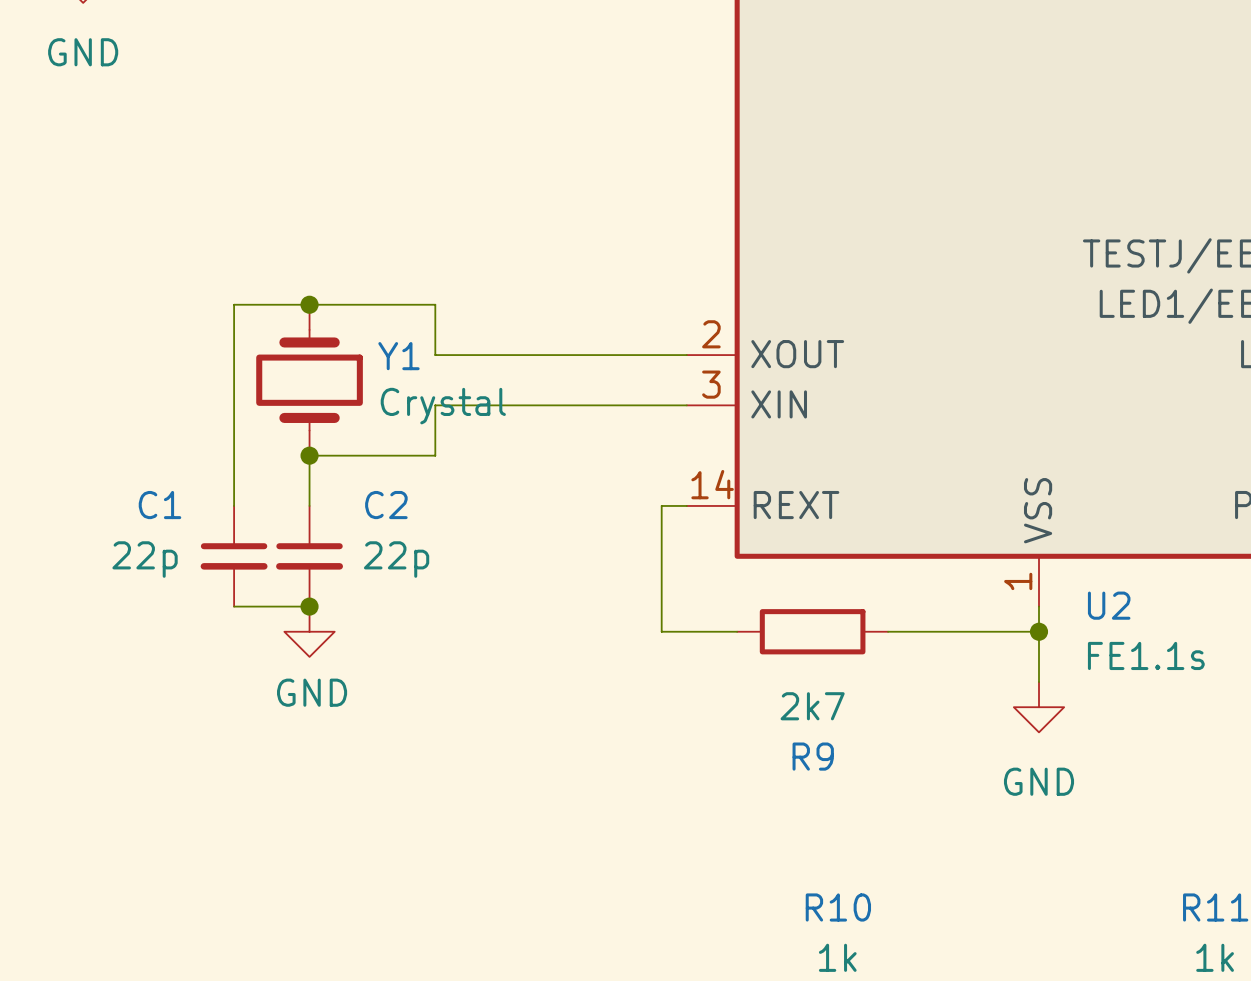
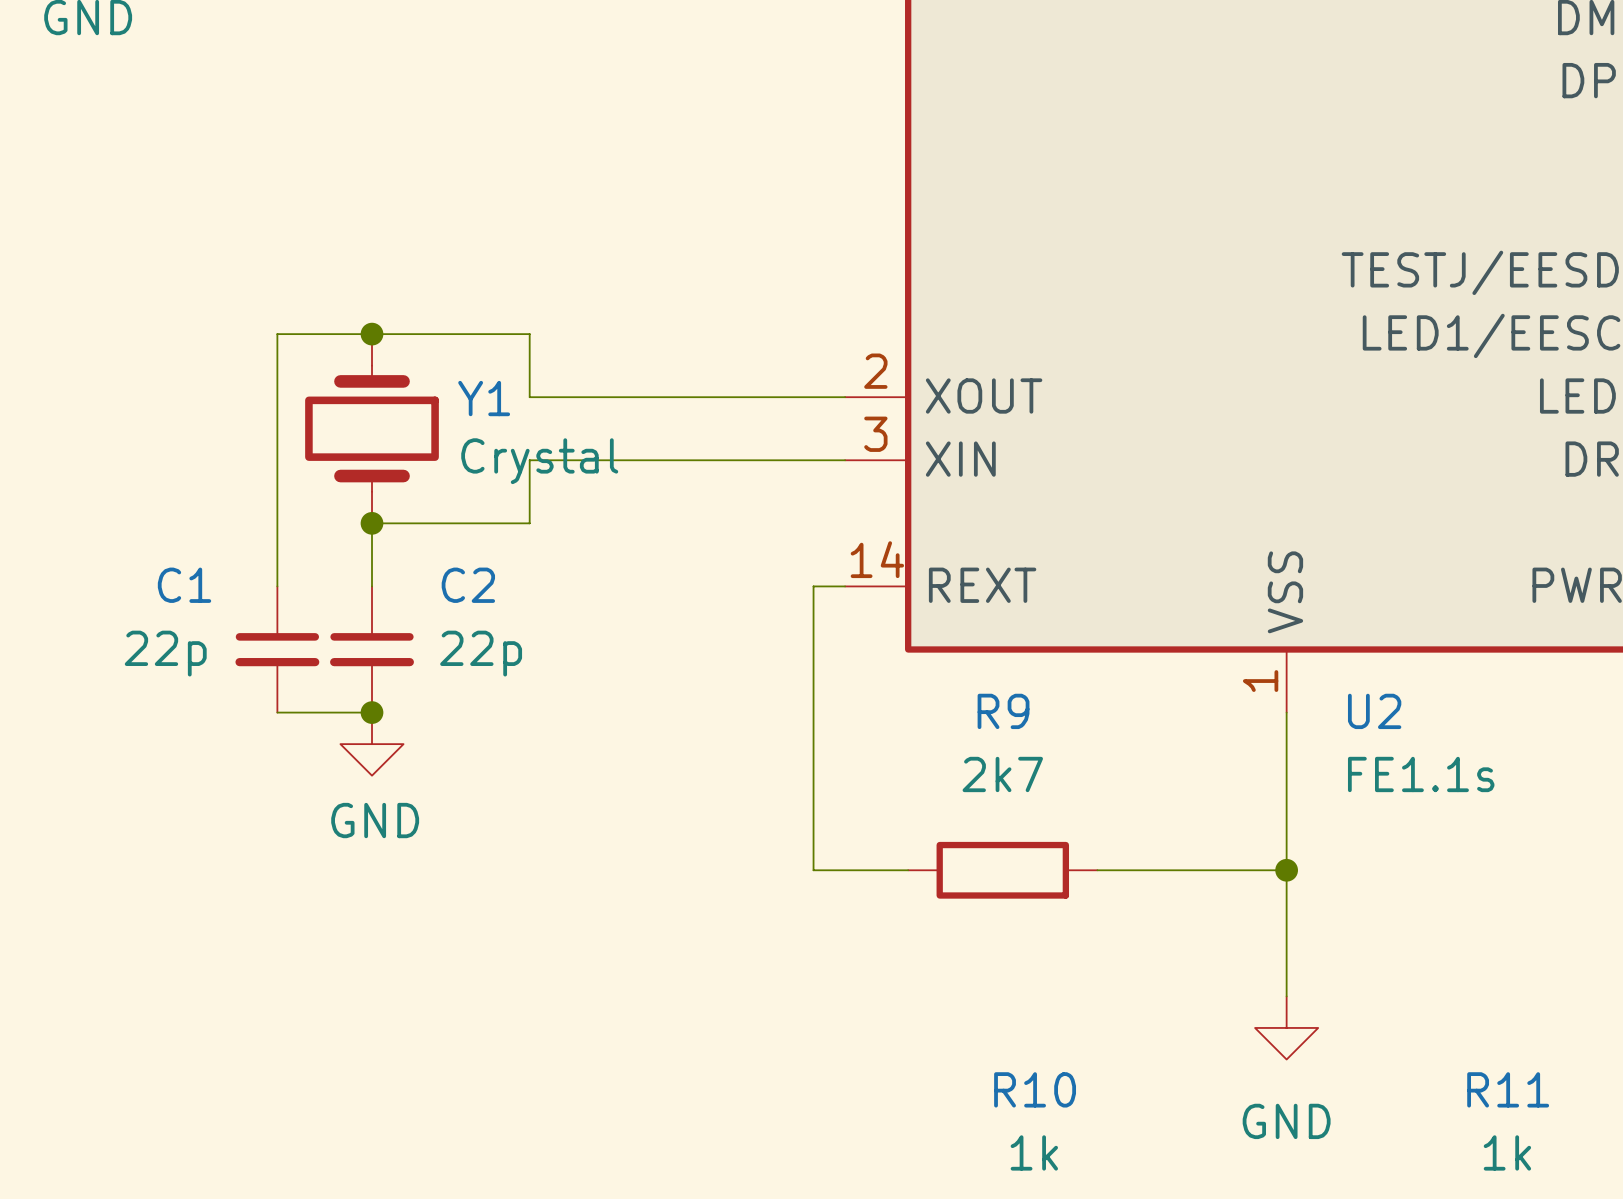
wire: (661, 631) (737, 631) -> (813, 744) (813, 870) (908, 870)
R9 position: (812, 631) -> (1002, 870)
wire: (888, 631) (1039, 631) -> (1097, 870) (1286, 870)
junction position: (1039, 631) -> (1286, 870)
wire: none -> (1286, 807) (1286, 996)
R9 value position: 2k7 (812, 706) -> 2k7 (1002, 774)
power symbol position: GND (1039, 707) -> GND (1286, 1027)
R9 name position: R9 (813, 756) -> R9 (1003, 711)

